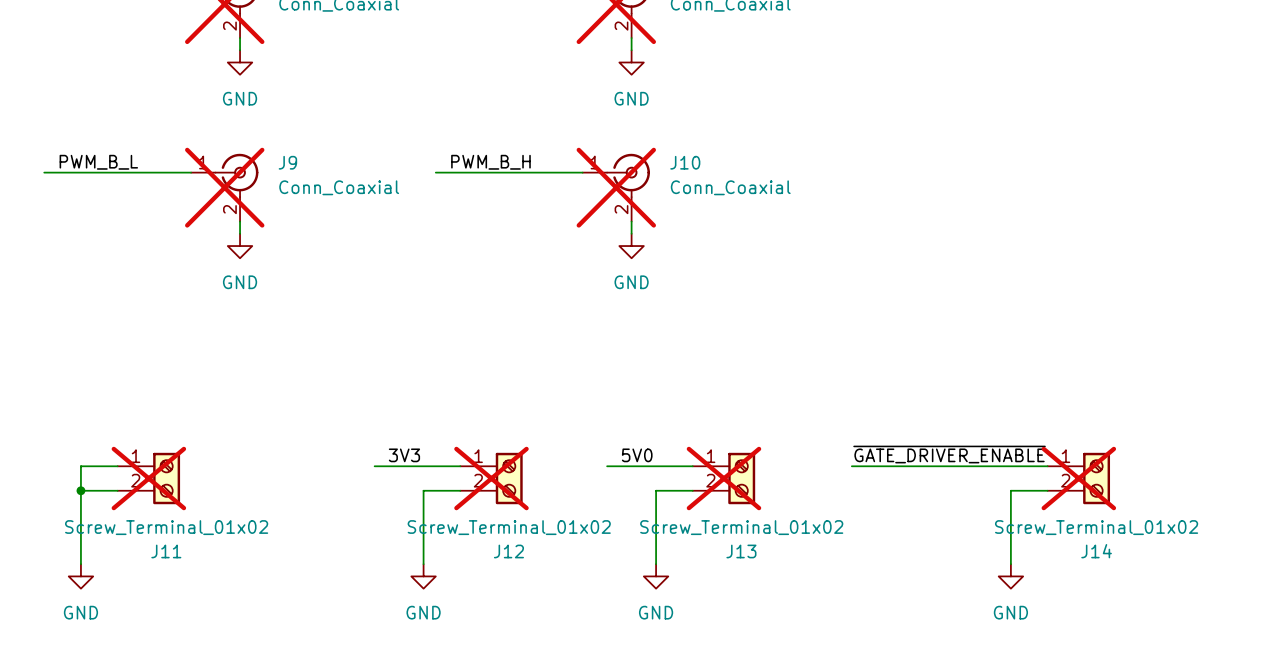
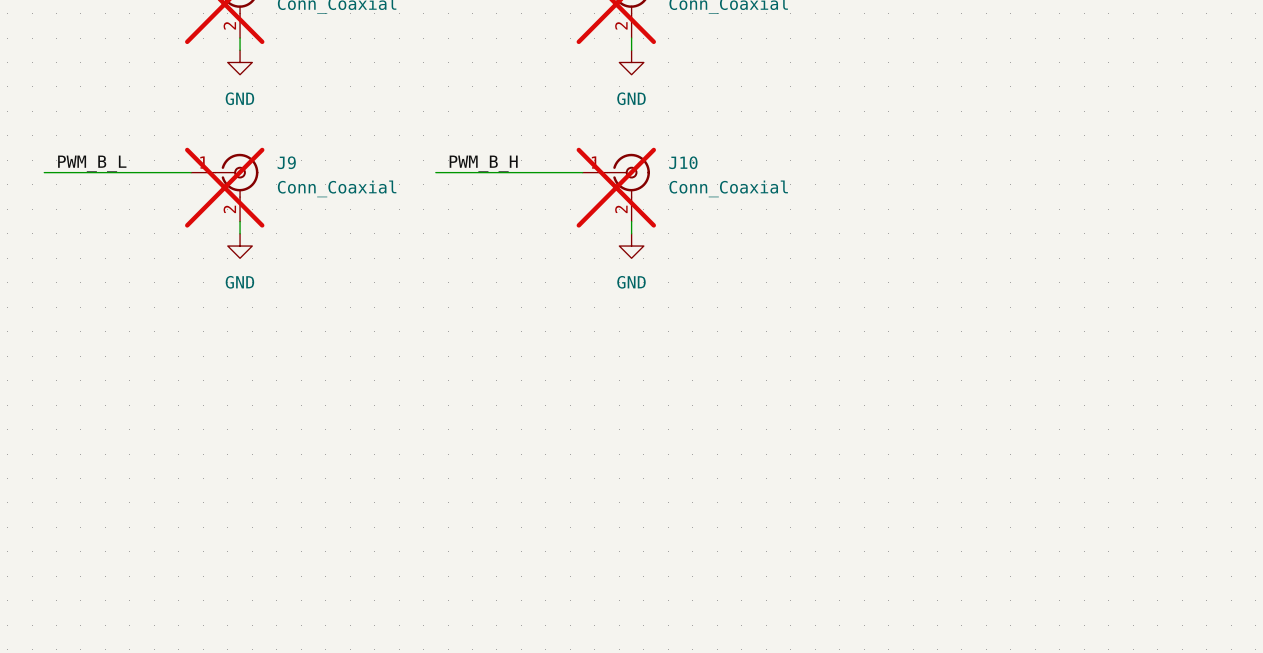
label: ~{GATE_DRIVER_ENABLE} (949, 454) -> none
label: 3V3 (404, 455) -> none
label: 5V0 (637, 455) -> none
wire: (117, 466) (80, 466) (80, 564) -> none
wire: (374, 466) (460, 466) -> none
wire: (607, 466) (692, 466) -> none
wire: (851, 466) (1047, 466) -> none
J11: Screw_Terminal_01x02 (148, 478) -> none
J12: Screw_Terminal_01x02 (491, 478) -> none
J13: Screw_Terminal_01x02 (723, 478) -> none
J14: Screw_Terminal_01x02 (1078, 478) -> none
wire: (80, 490) (117, 490) -> none
junction: (80, 490) -> none
wire: (460, 490) (423, 490) (423, 564) -> none
wire: (692, 490) (656, 490) (656, 564) -> none
wire: (1047, 490) (1010, 490) (1010, 564) -> none
power symbol: GND (80, 576) -> none
power symbol: GND (423, 576) -> none
power symbol: GND (656, 576) -> none
power symbol: GND (1010, 576) -> none

